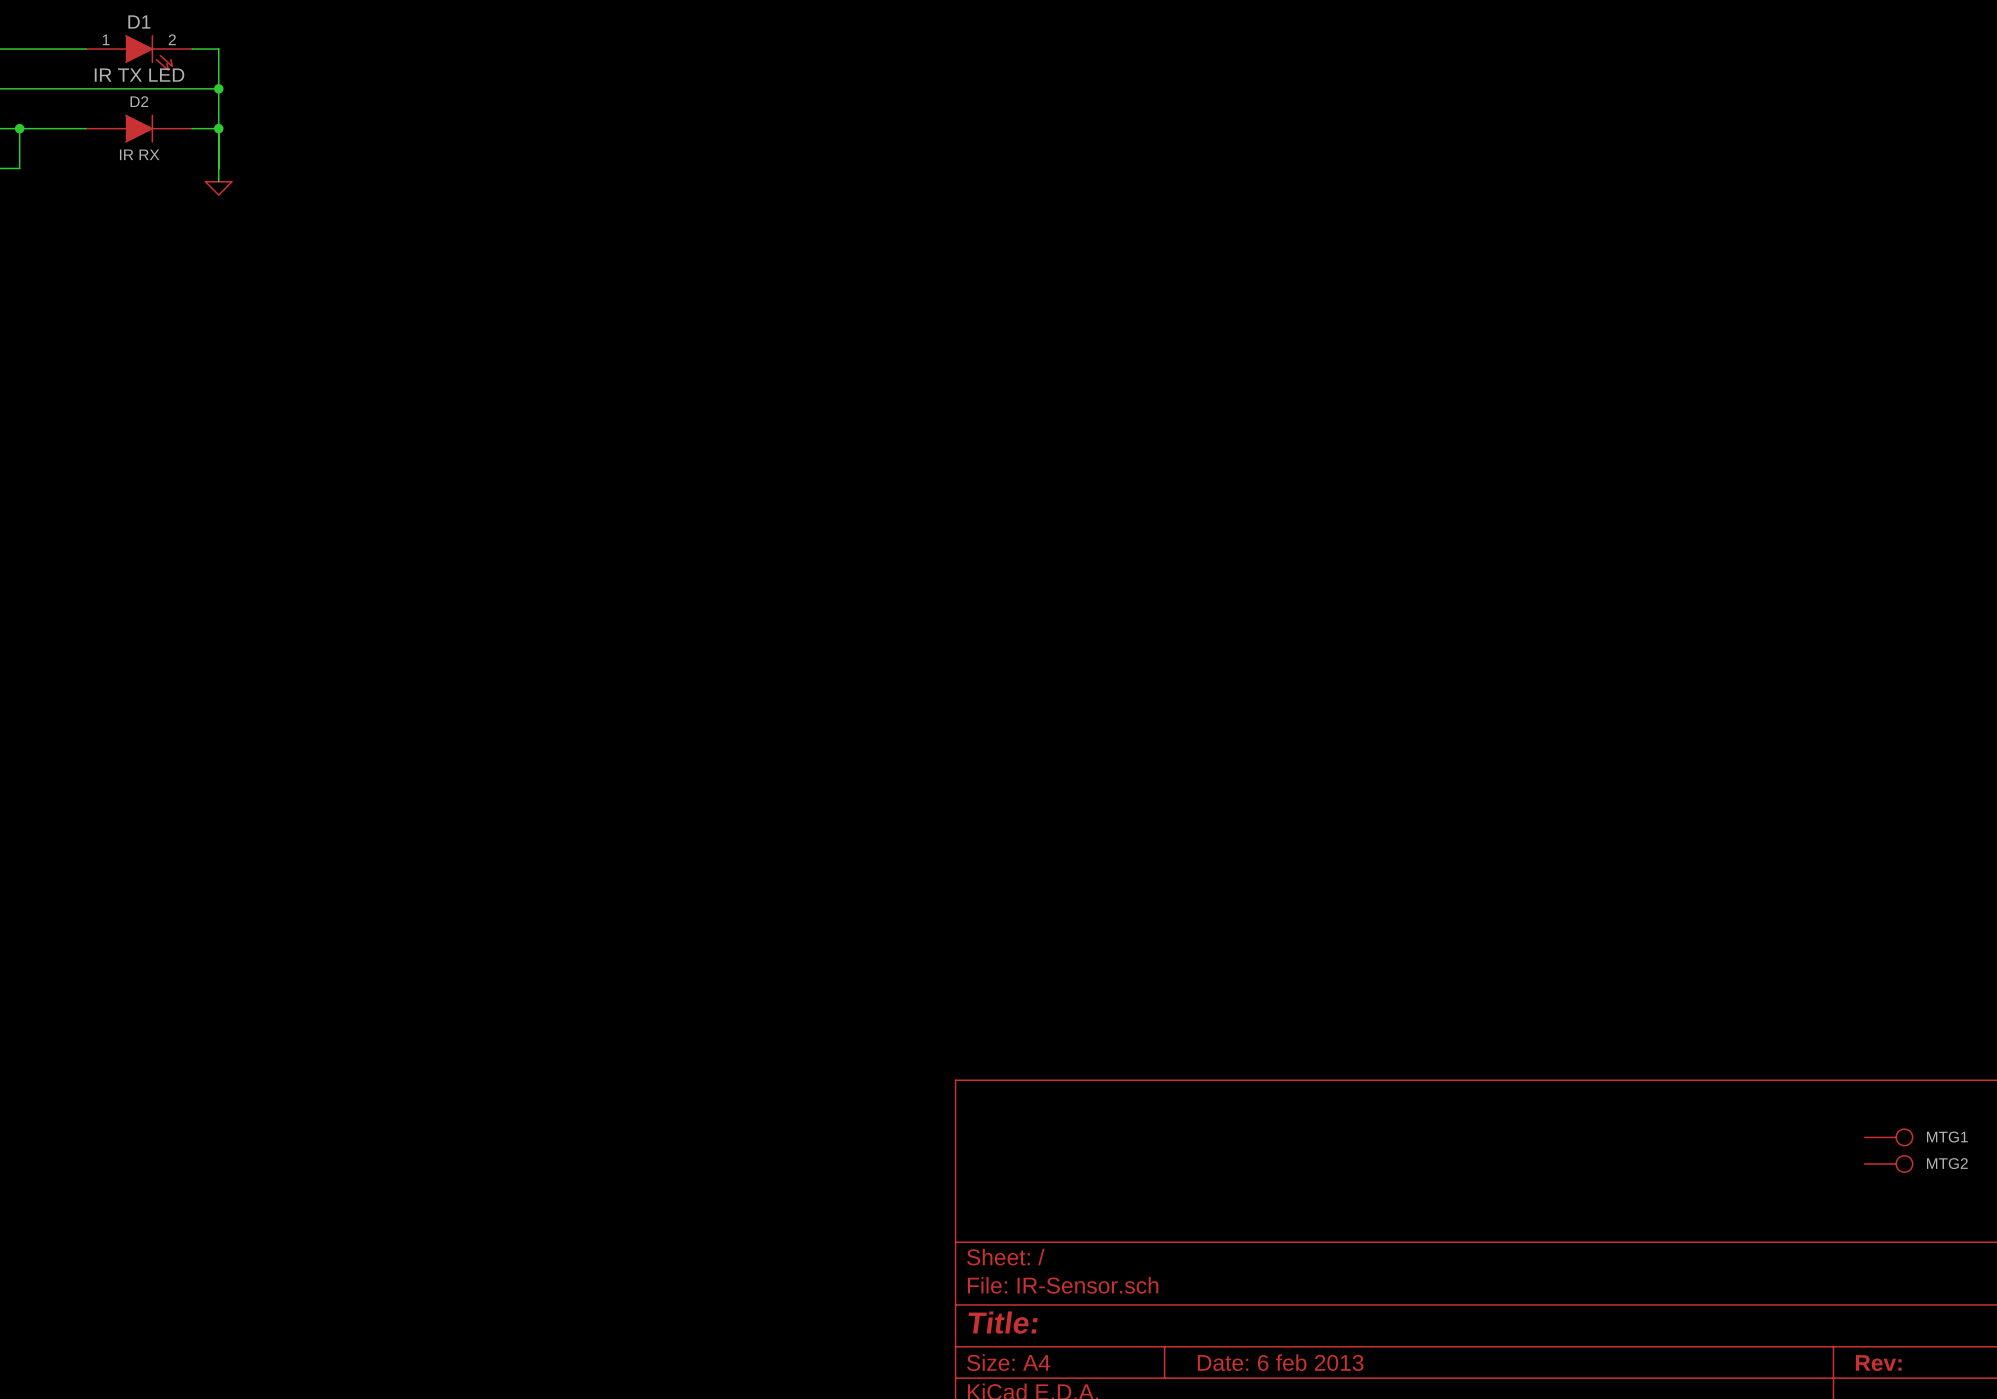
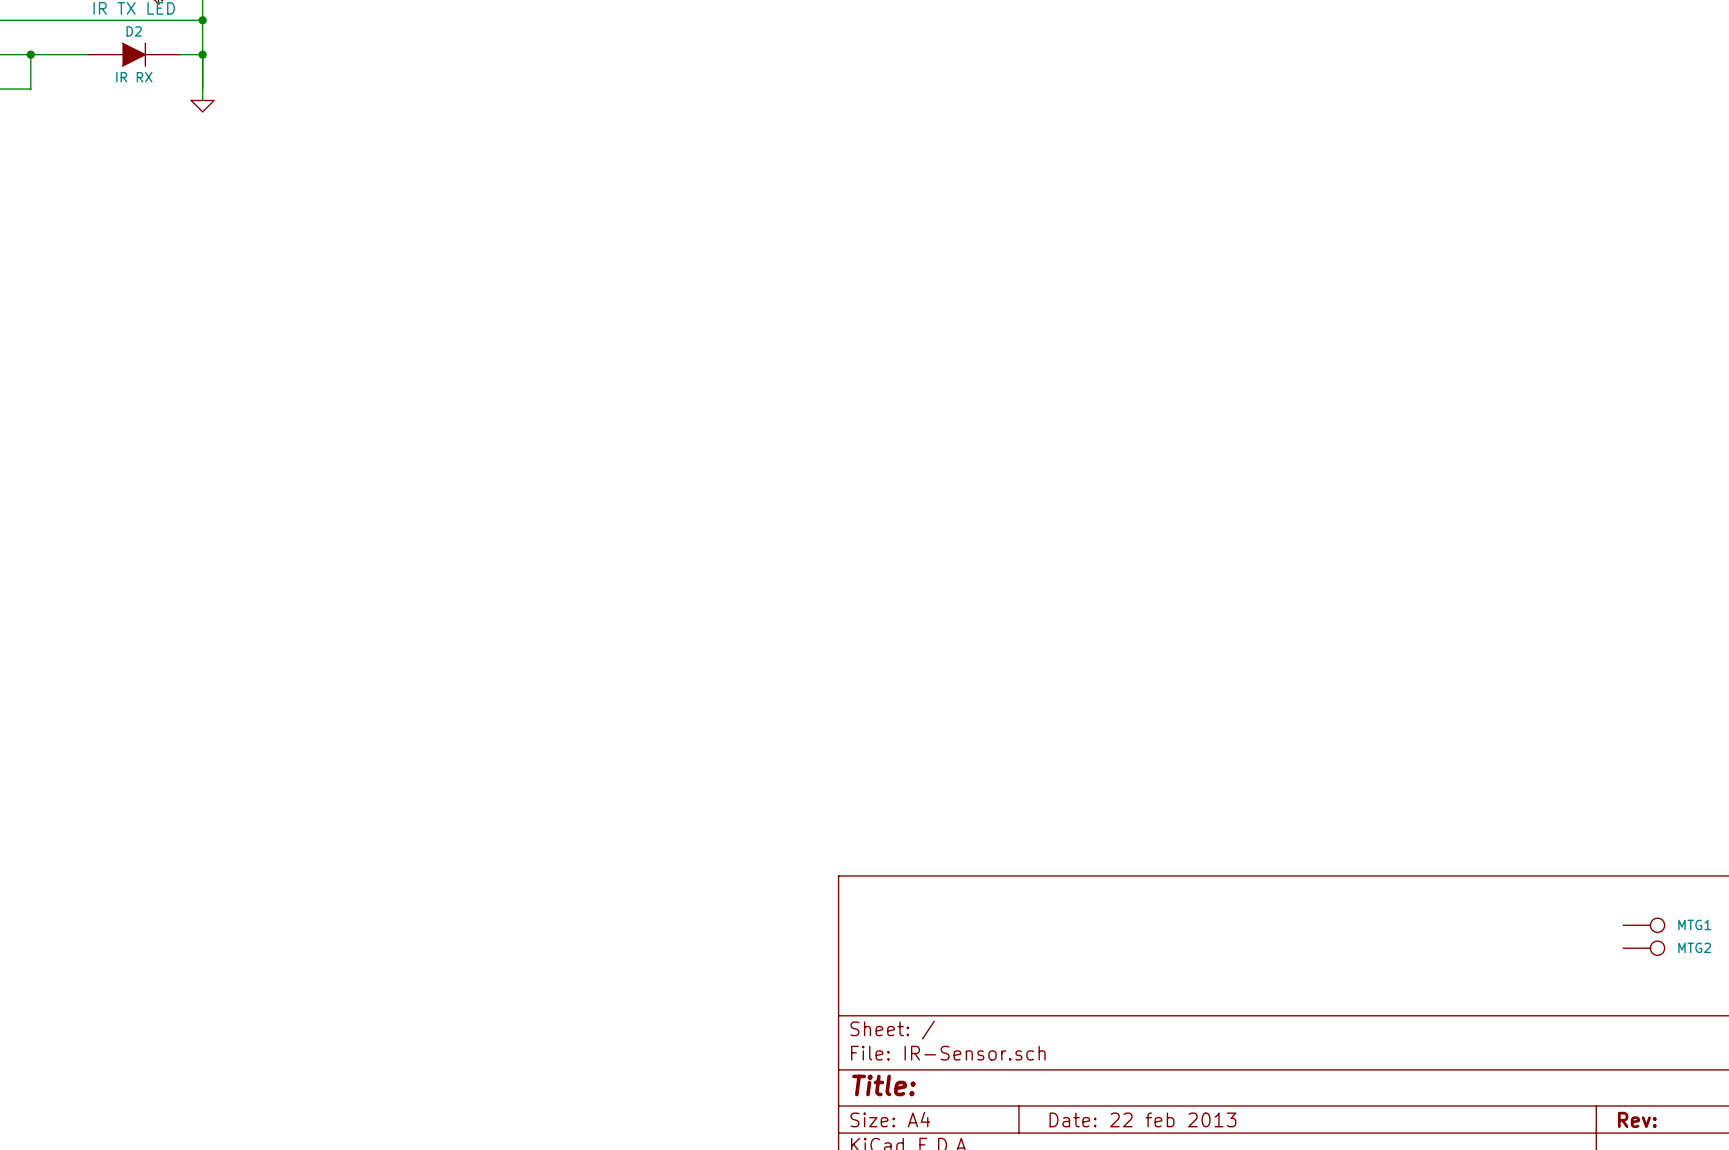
title block: Date: 6 feb 2013 (1280, 1362) -> Date: 22 feb 2013 (1142, 1119)

